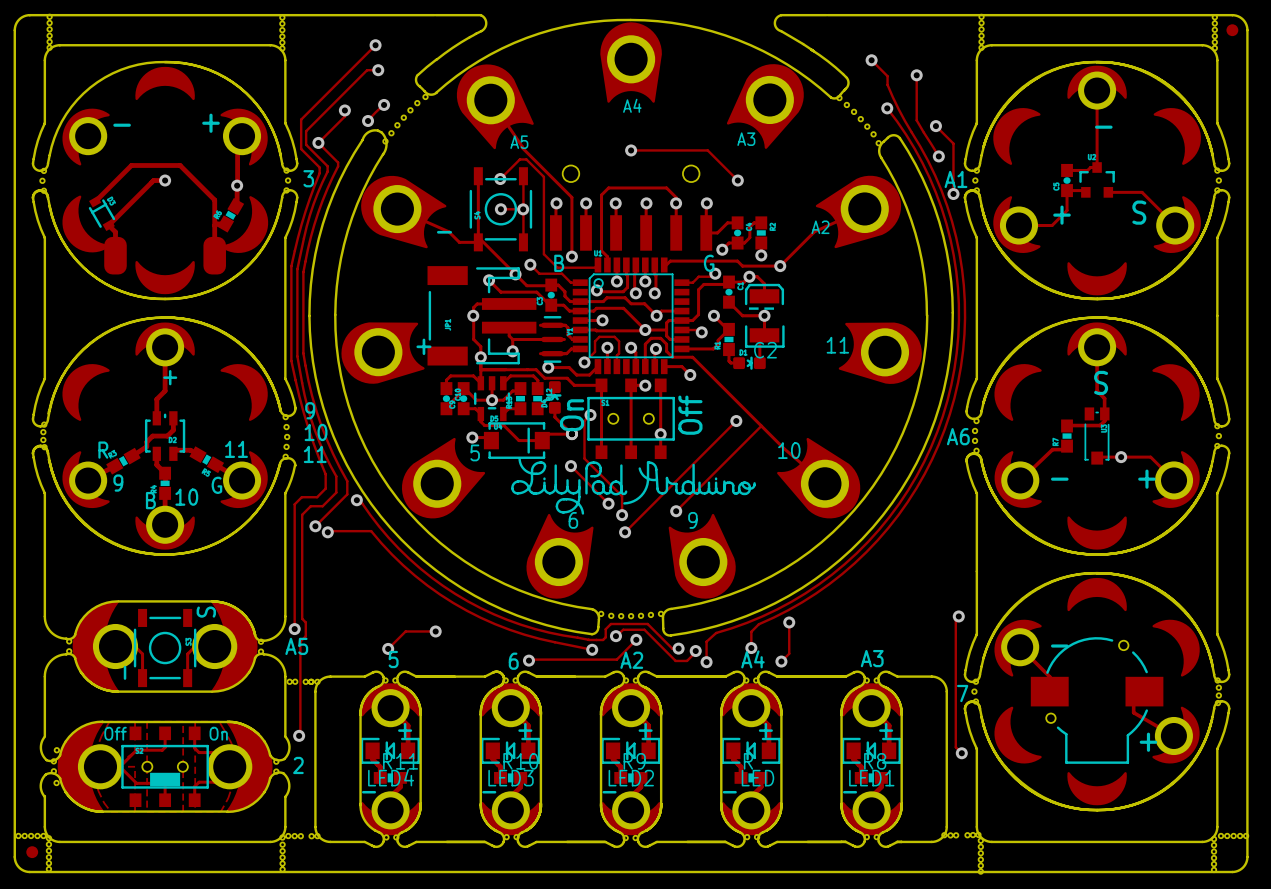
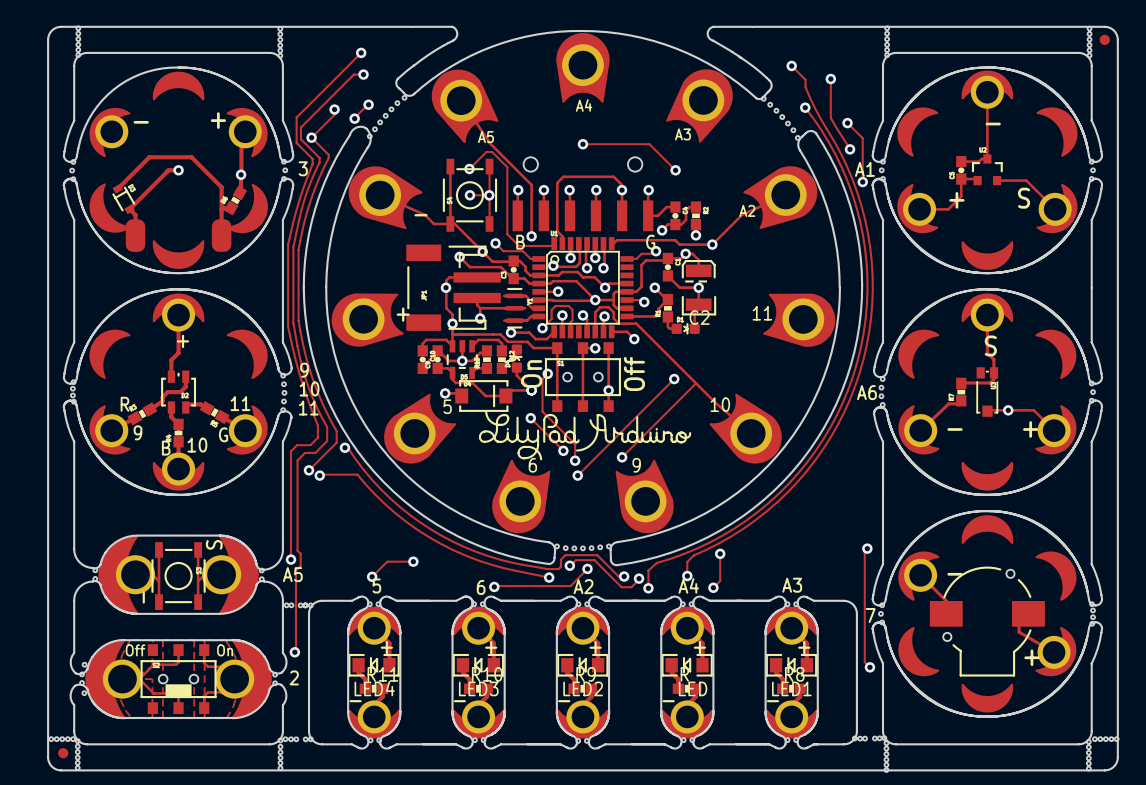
track: none -> (158, 546) (158, 581)
track: none -> (198, 546) (198, 581)

